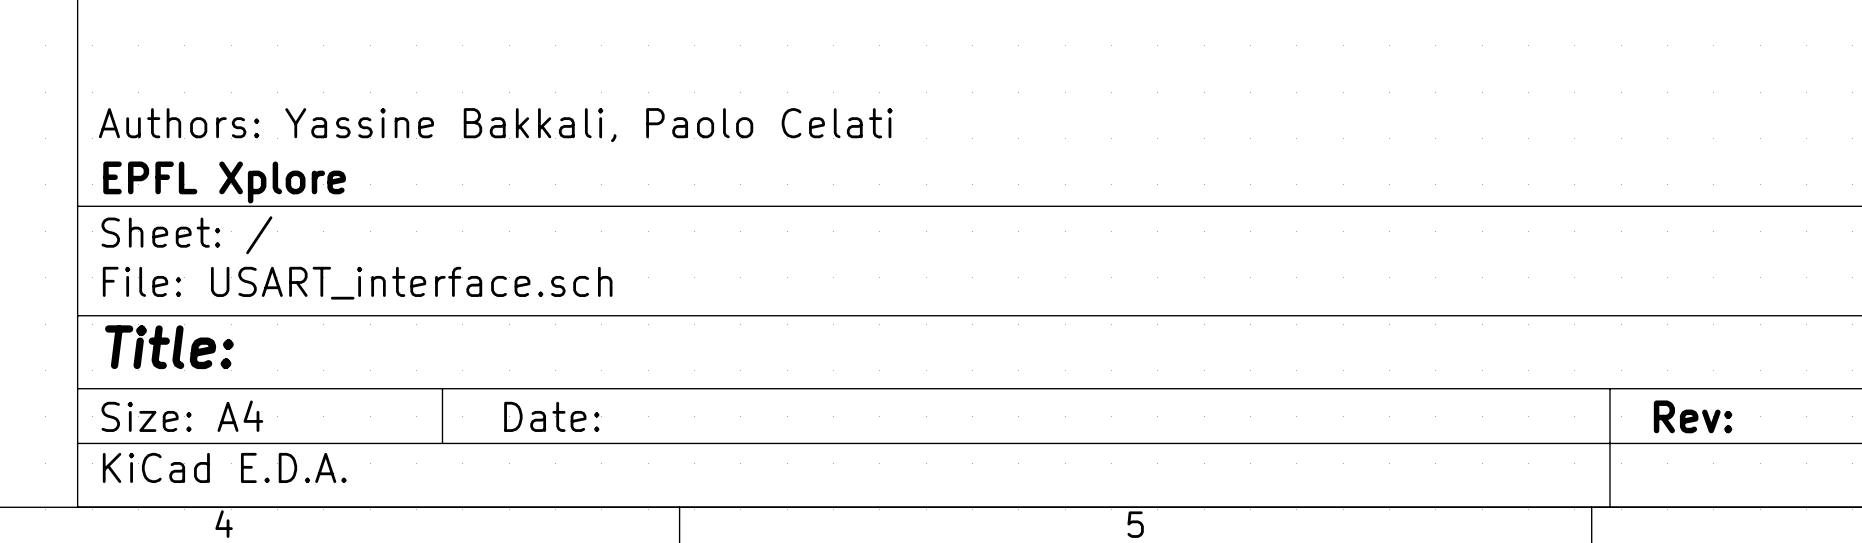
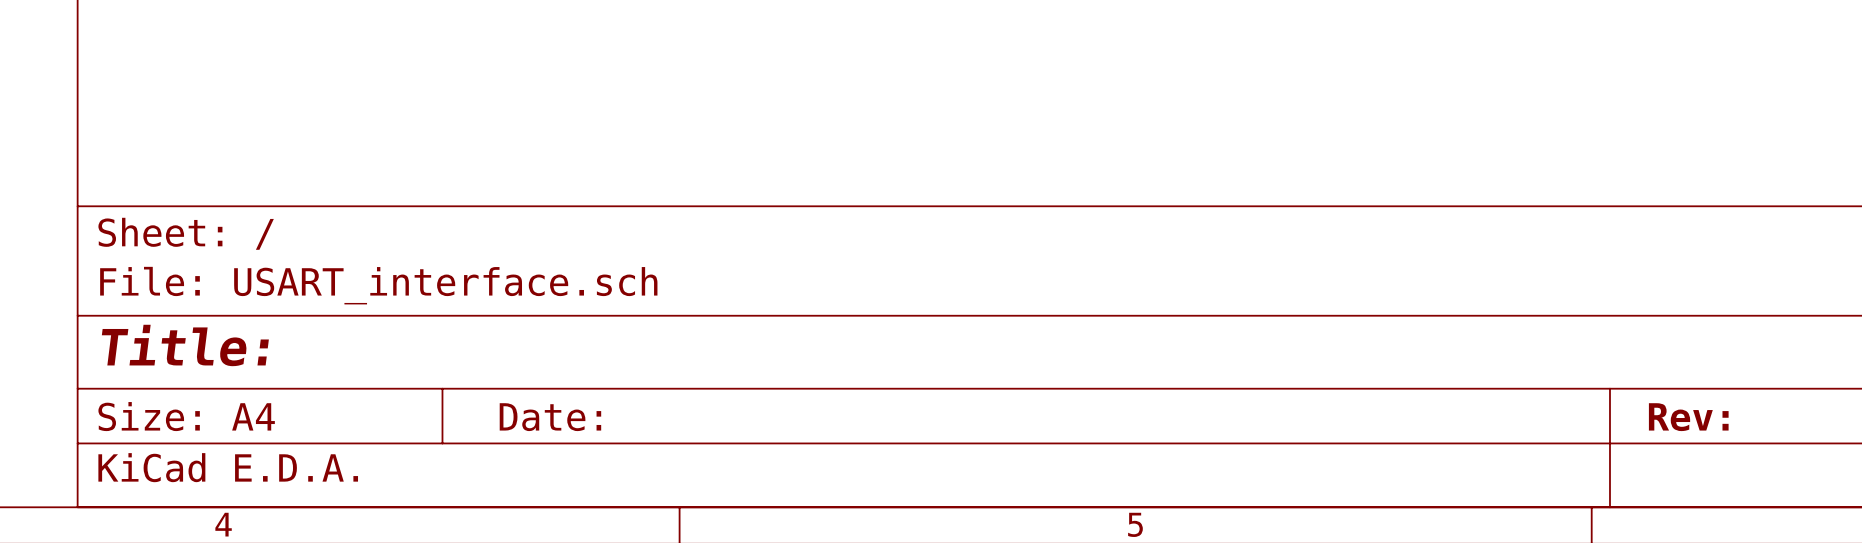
title block: Authors: Yassine Bakkali, Paolo Celati (495, 125) -> none
title block: EPFL Xplore (224, 182) -> none

